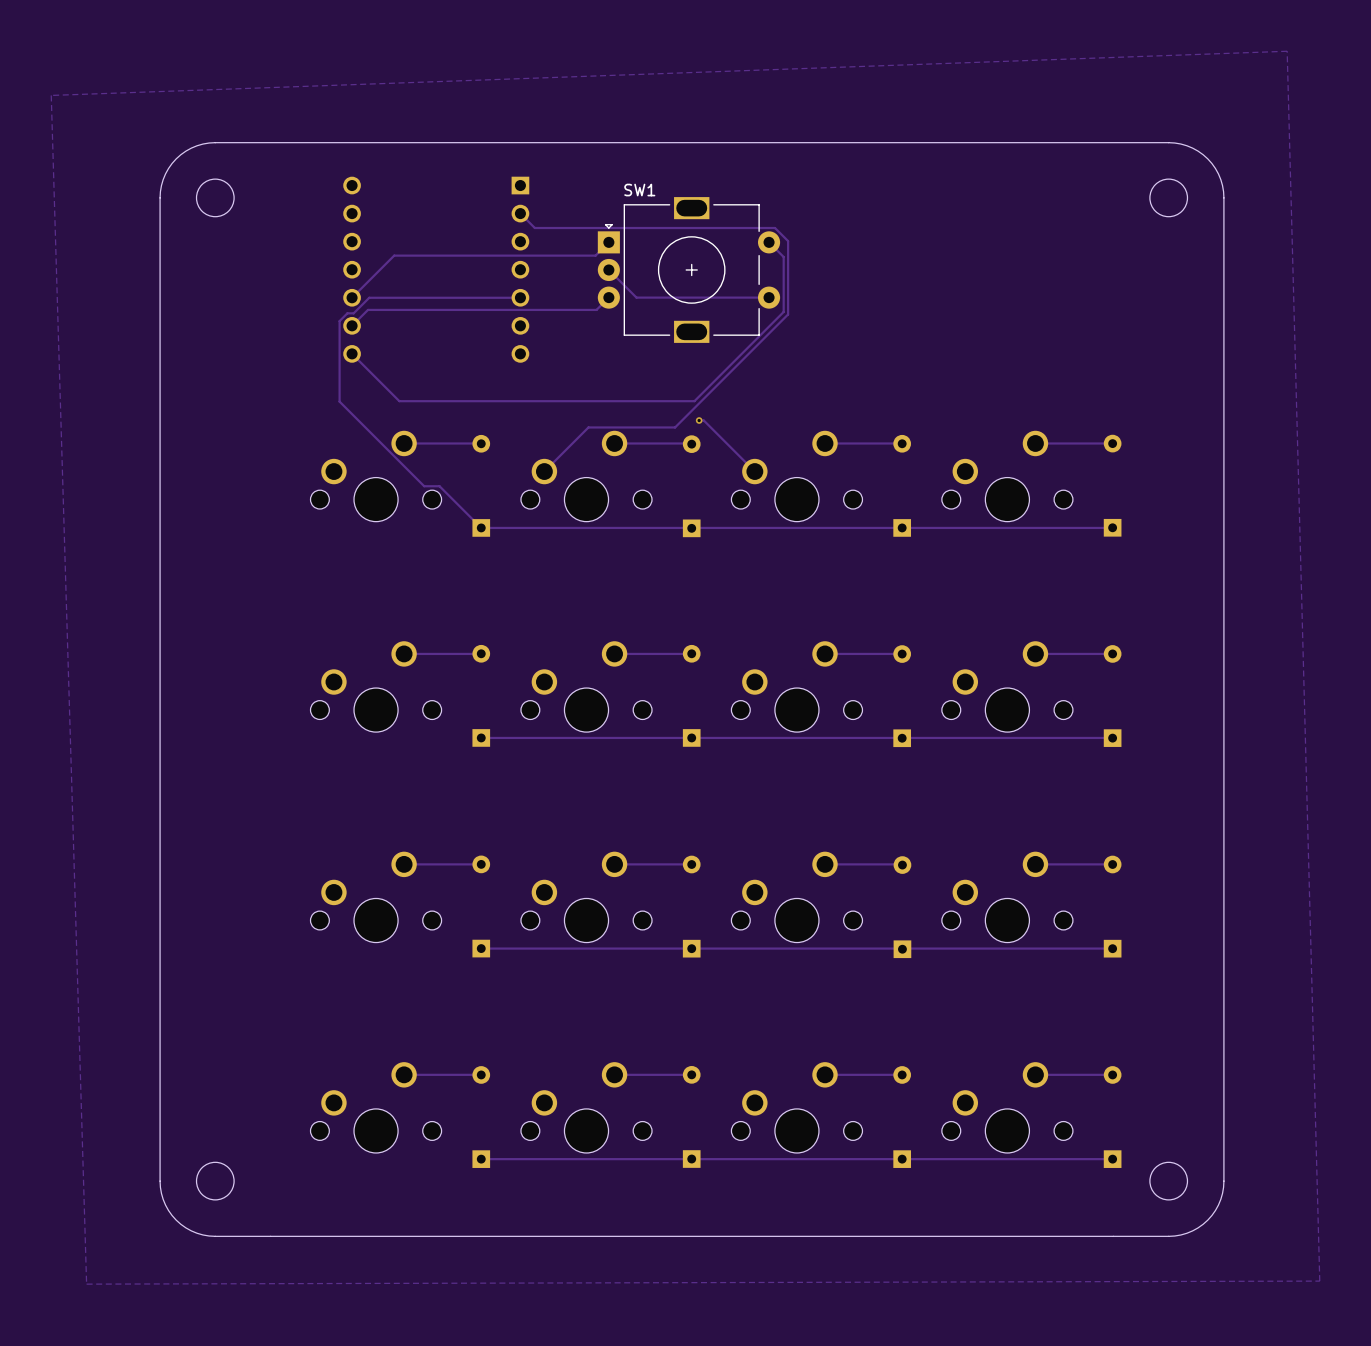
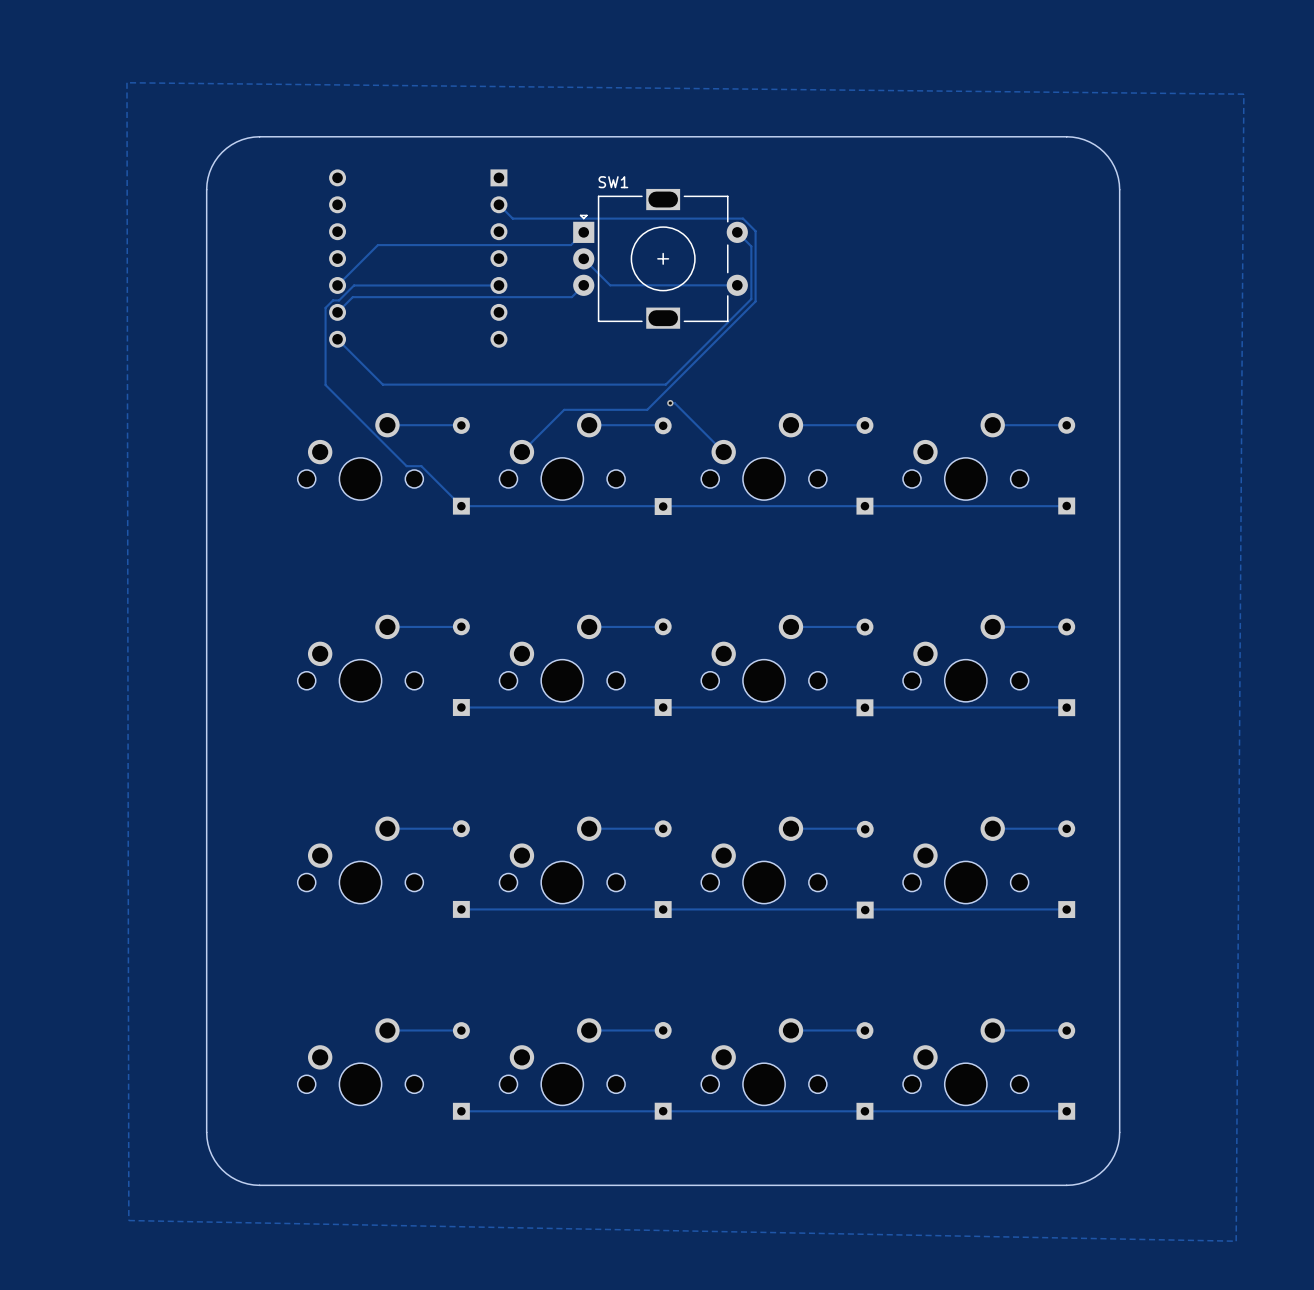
zone outline: (1287, 51) (1319, 1281) (86, 1284) (51, 95) (1287, 51) -> (126, 82) (128, 1220) (1236, 1241) (1243, 94) (126, 82)
board edge: (270, 142) (209, 143) (191, 148) (176, 158) (168, 168) (163, 179) (160, 197) (160, 1187) (168, 1210) (180, 1224) (191, 1230) (209, 1236) (270, 1236) -> (259, 136) (236, 142) (222, 152) (211, 166) (206, 189) (206, 1132) (209, 1149) (222, 1169) (242, 1182) (259, 1185)
board edge: (1112, 142) (1174, 143) (1192, 148) (1203, 154) (1215, 168) (1220, 179) (1223, 197) (1223, 1187) (1220, 1199) (1211, 1215) (1192, 1230) (1174, 1236) (1112, 1236) -> (1066, 136) (1084, 139) (1104, 152) (1116, 172) (1119, 189) (1119, 1132) (1114, 1155) (1104, 1169) (1089, 1180) (1066, 1185)
round board edge: [196, 178, 235, 217] -> none
round board edge: [1149, 178, 1188, 217] -> none
round board edge: [196, 1162, 235, 1201] -> none
round board edge: [1149, 1162, 1188, 1201] -> none

